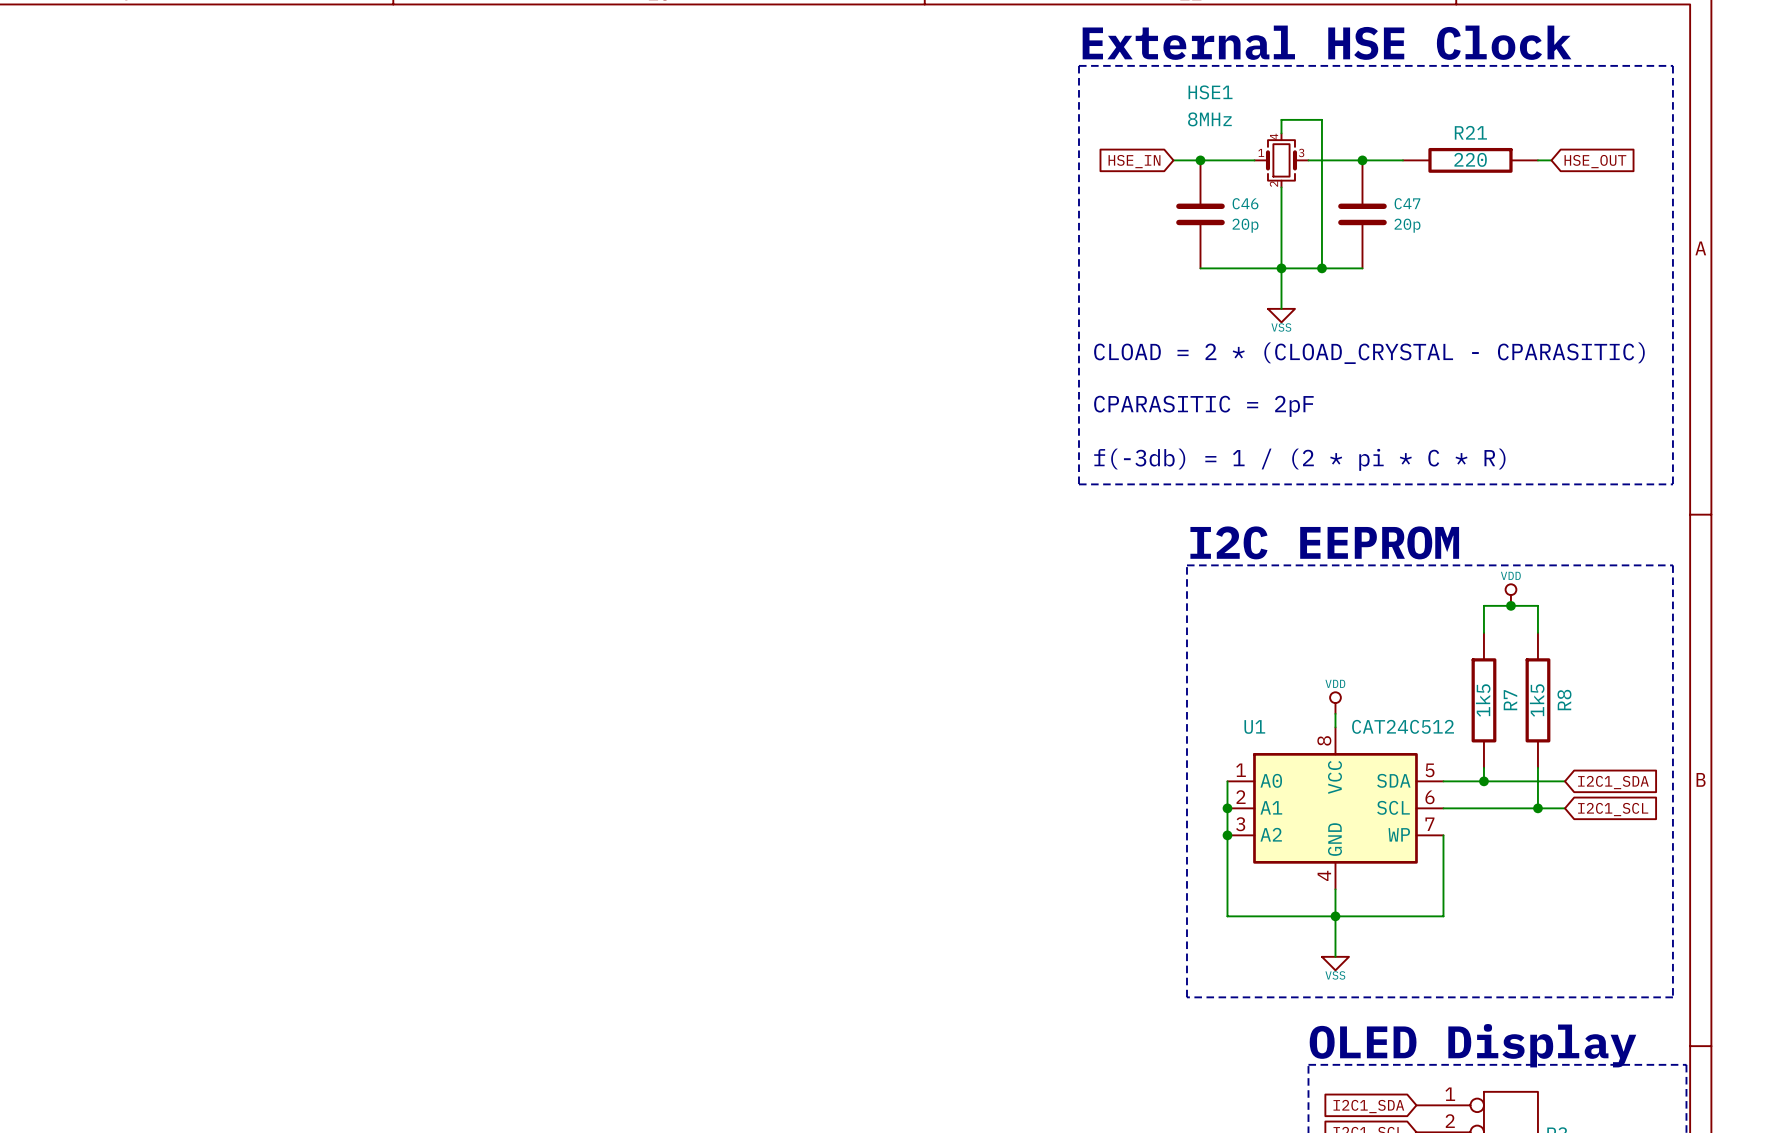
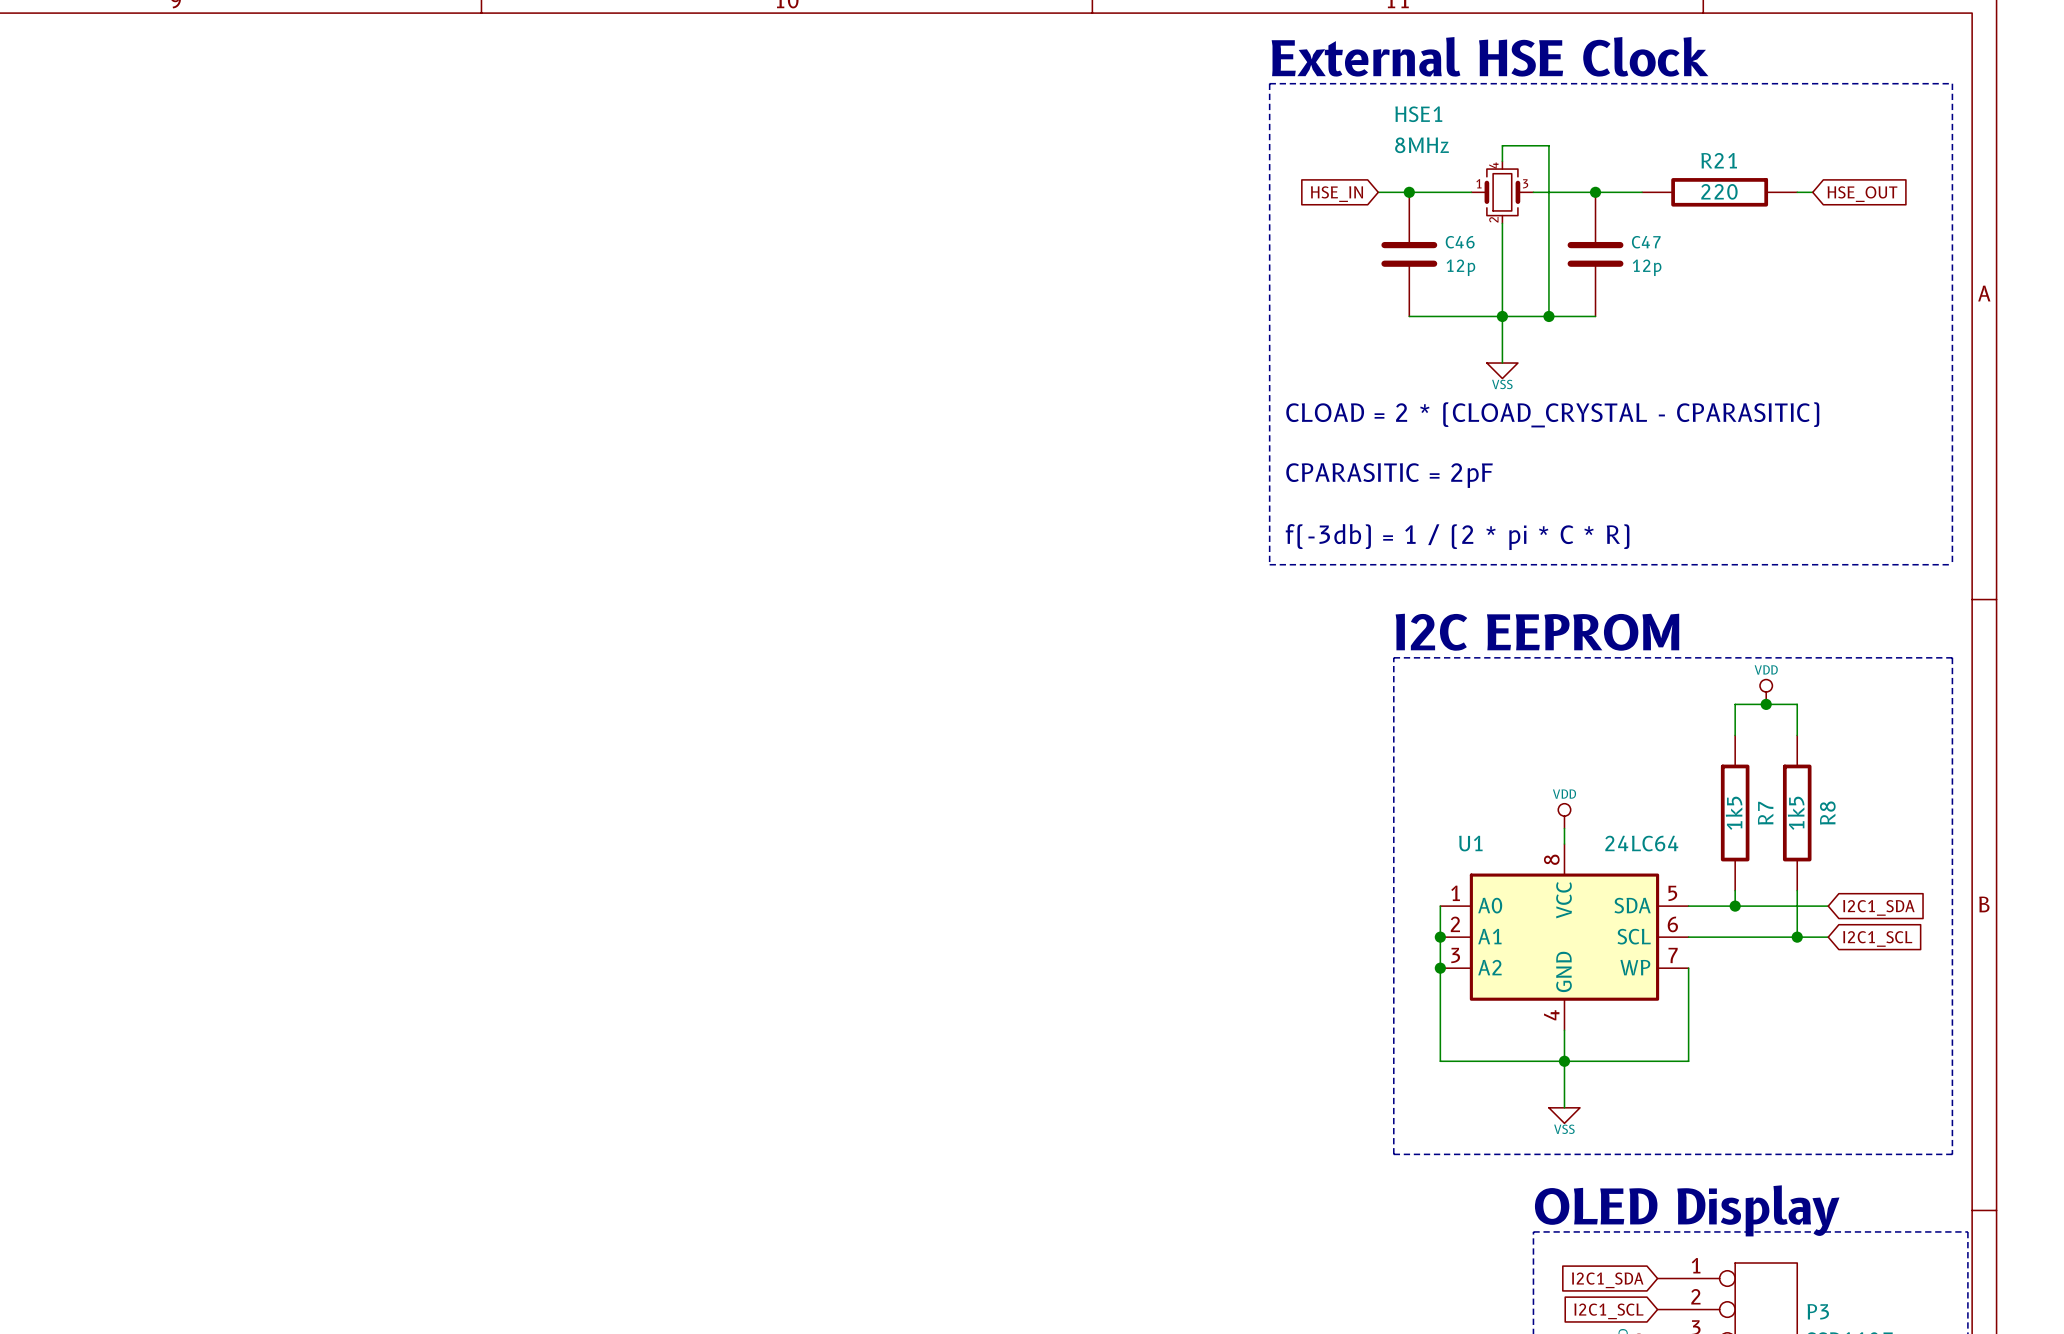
C46 value: 20p (1245, 225) -> 12p (1460, 267)
C47 value: 20p (1407, 225) -> 12p (1647, 267)
U1 value: CAT24C512 (1403, 726) -> 24LC64 (1641, 843)

